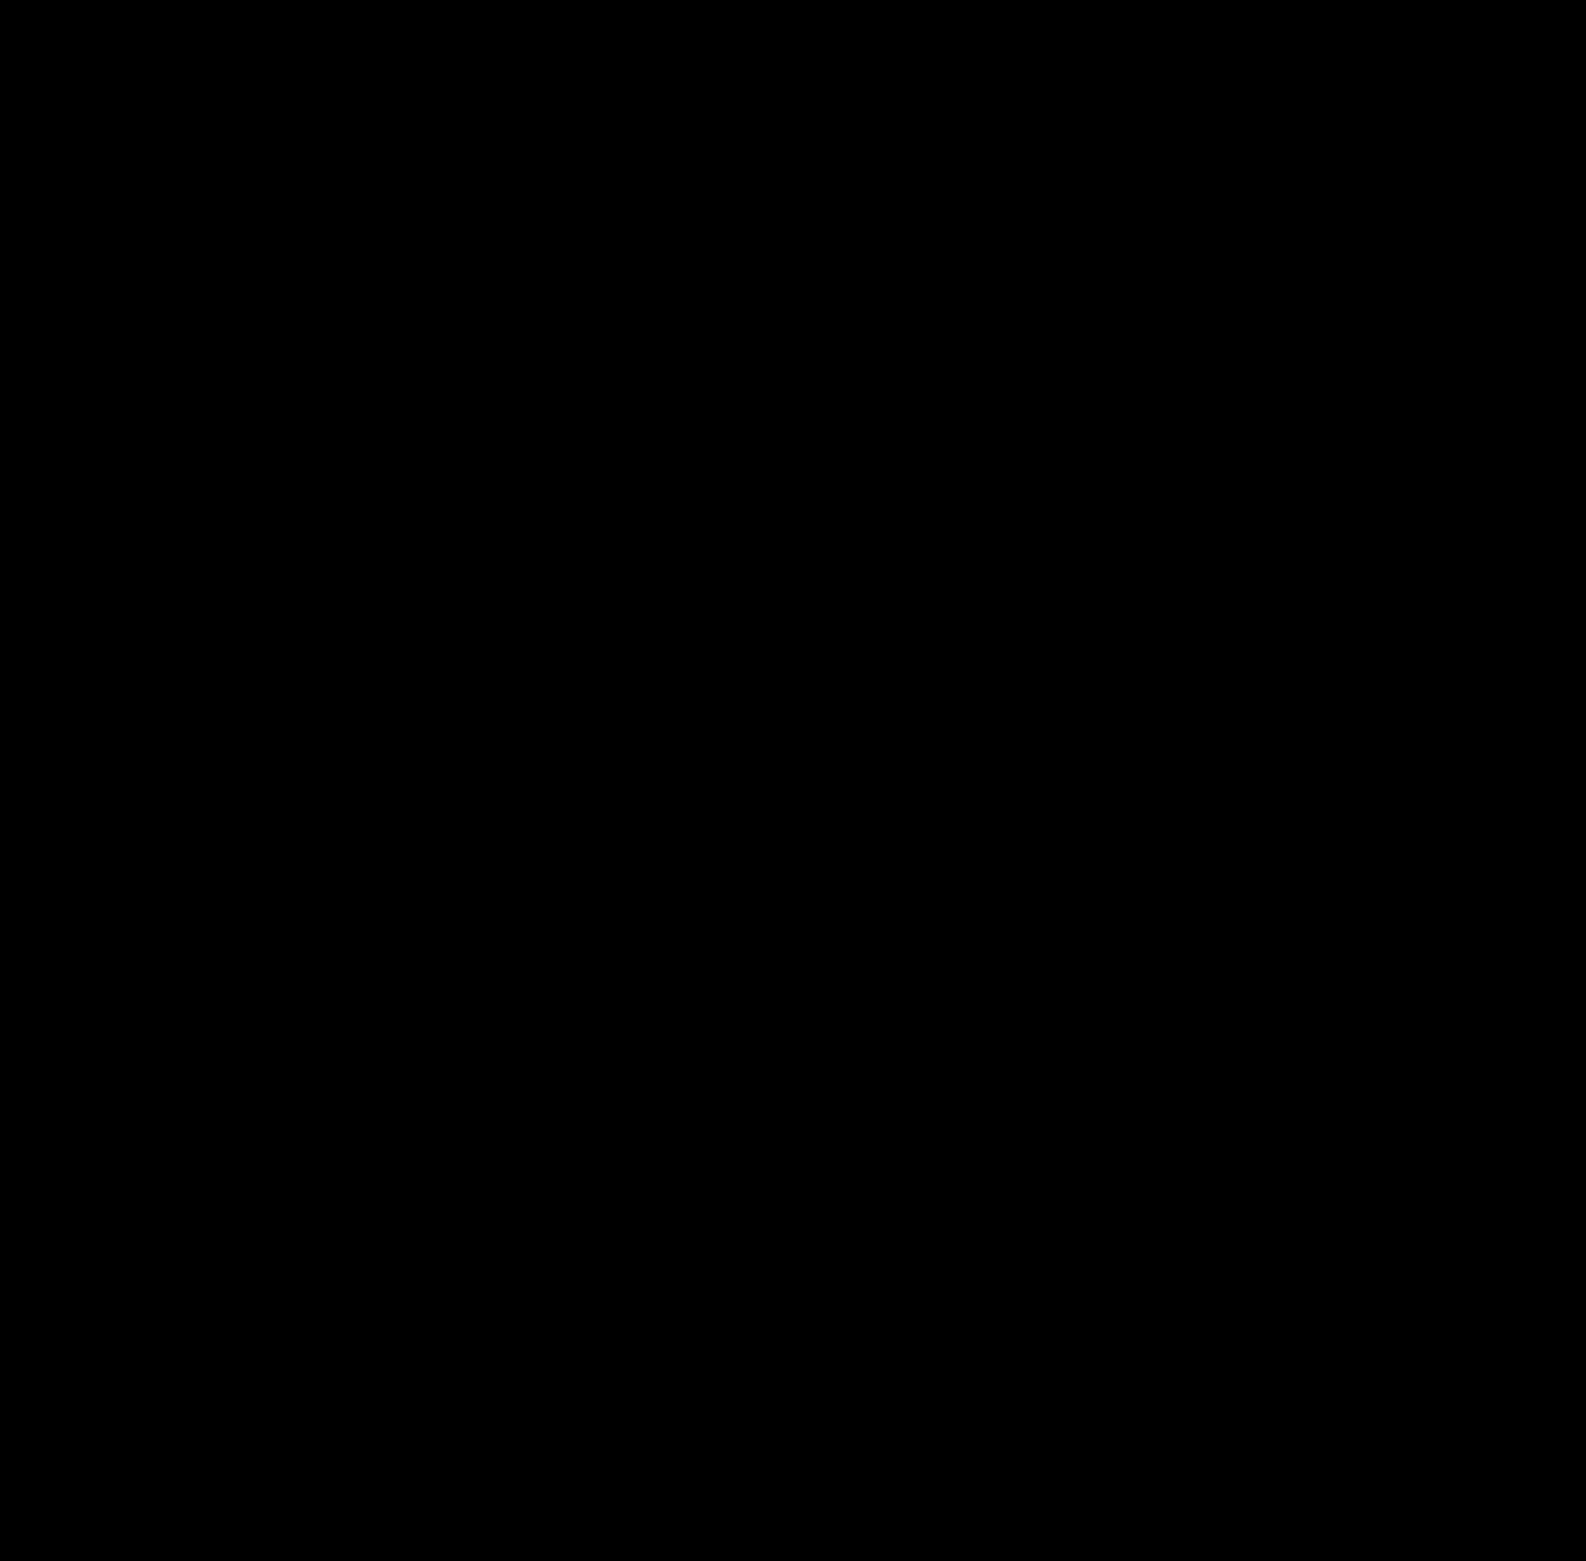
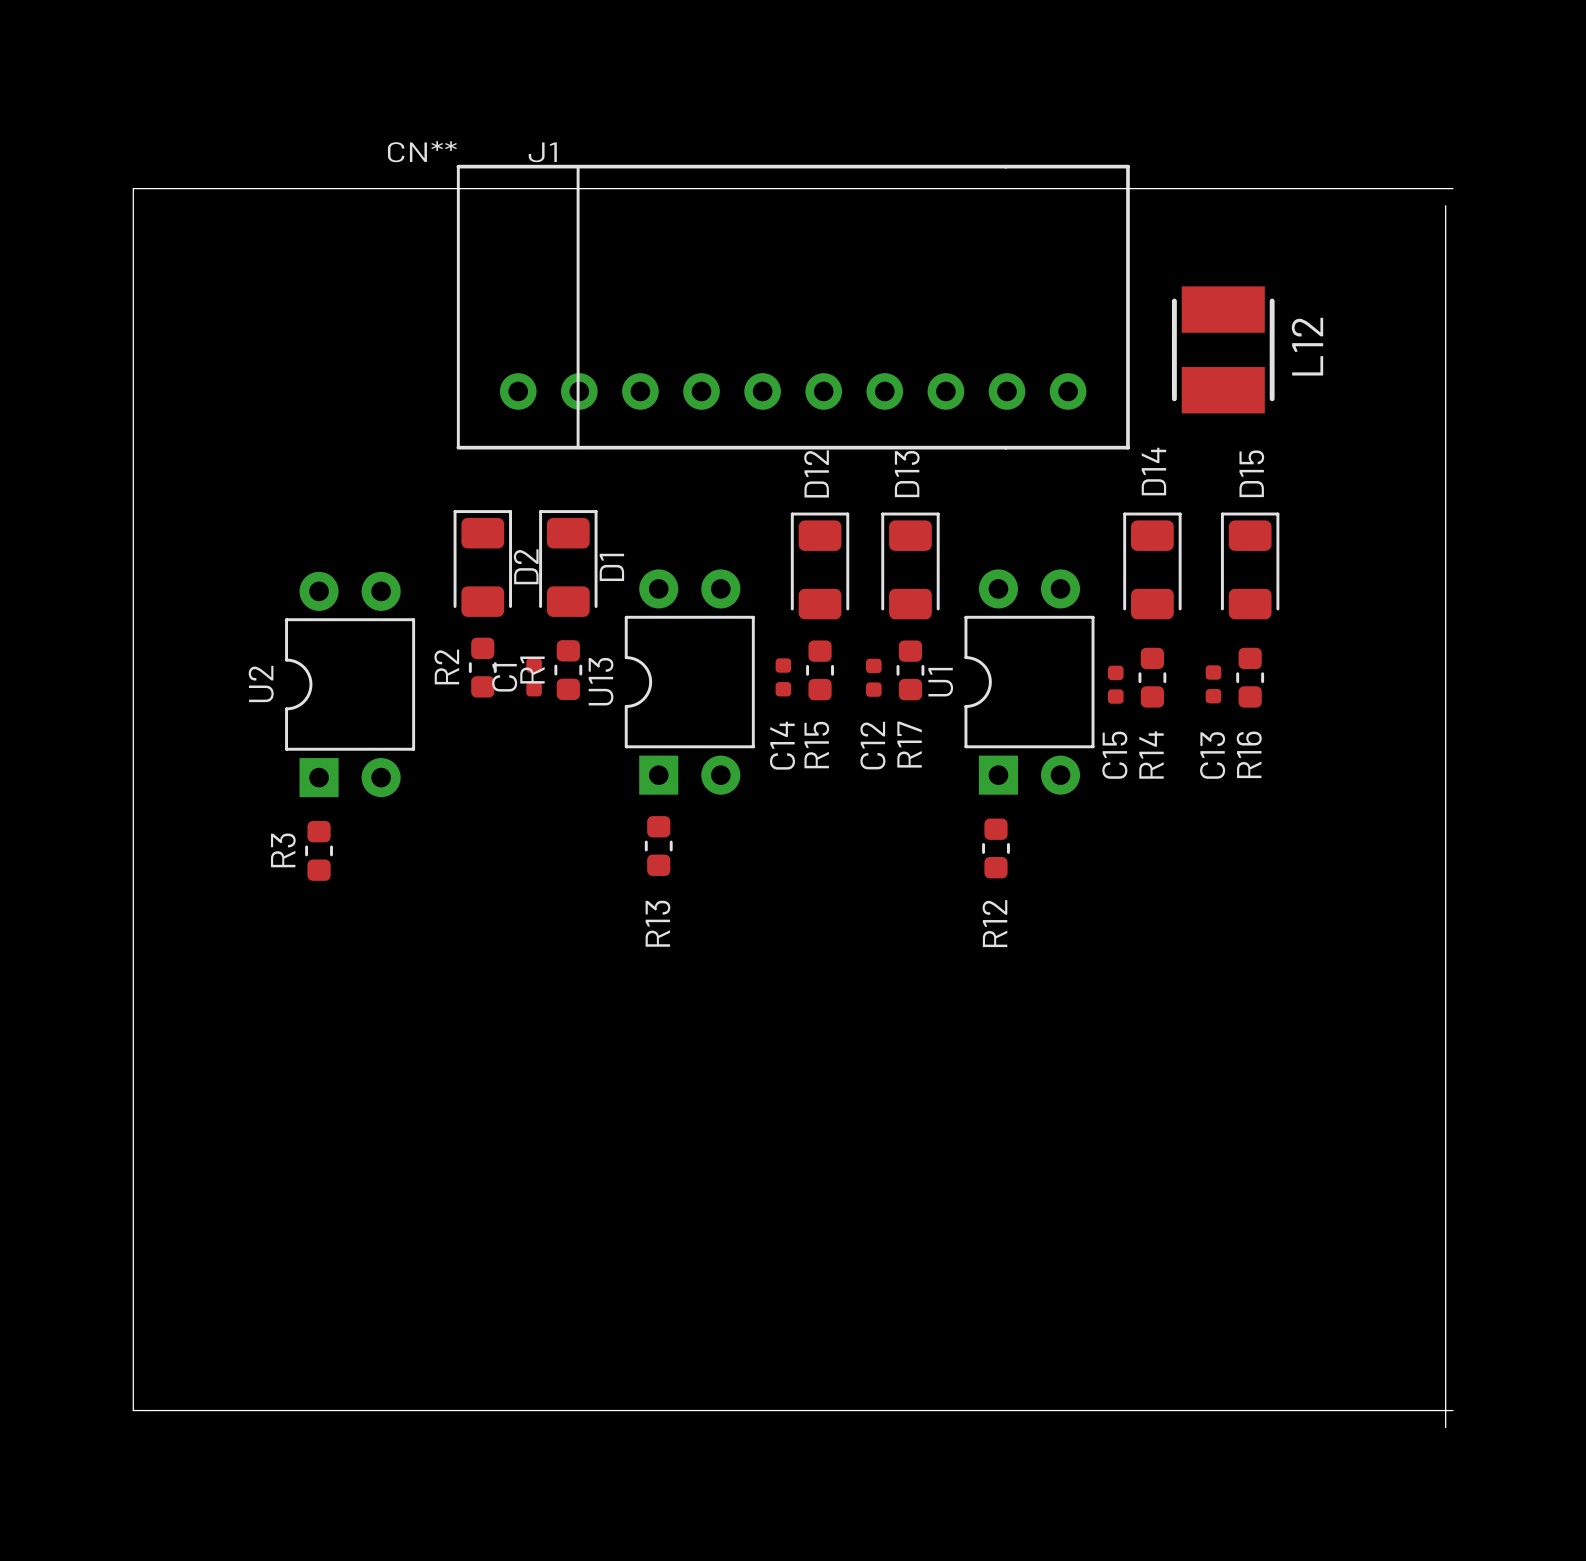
board edge: none -> (1453, 188) (133, 188) (133, 1410) (1453, 1410)
board edge: none -> (1445, 205) (1445, 1427)
J1: none -> (793, 307)
L12: none -> (1223, 349)
D2: none -> (482, 563)
D1: none -> (568, 563)
D12: none -> (820, 565)
D13: none -> (910, 565)
D14: none -> (1152, 565)
D15: none -> (1250, 565)
R2: none -> (482, 667)
R1: none -> (568, 670)
R15: none -> (820, 670)
R17: none -> (910, 670)
C1: none -> (534, 677)
C14: none -> (783, 677)
C12: none -> (873, 677)
R14: none -> (1152, 677)
R16: none -> (1250, 677)
U13: none -> (689, 682)
U1: none -> (1029, 682)
U2: none -> (350, 684)
C15: none -> (1115, 684)
C13: none -> (1213, 684)
R13: none -> (658, 846)
R12: none -> (996, 848)
R3: none -> (319, 850)

